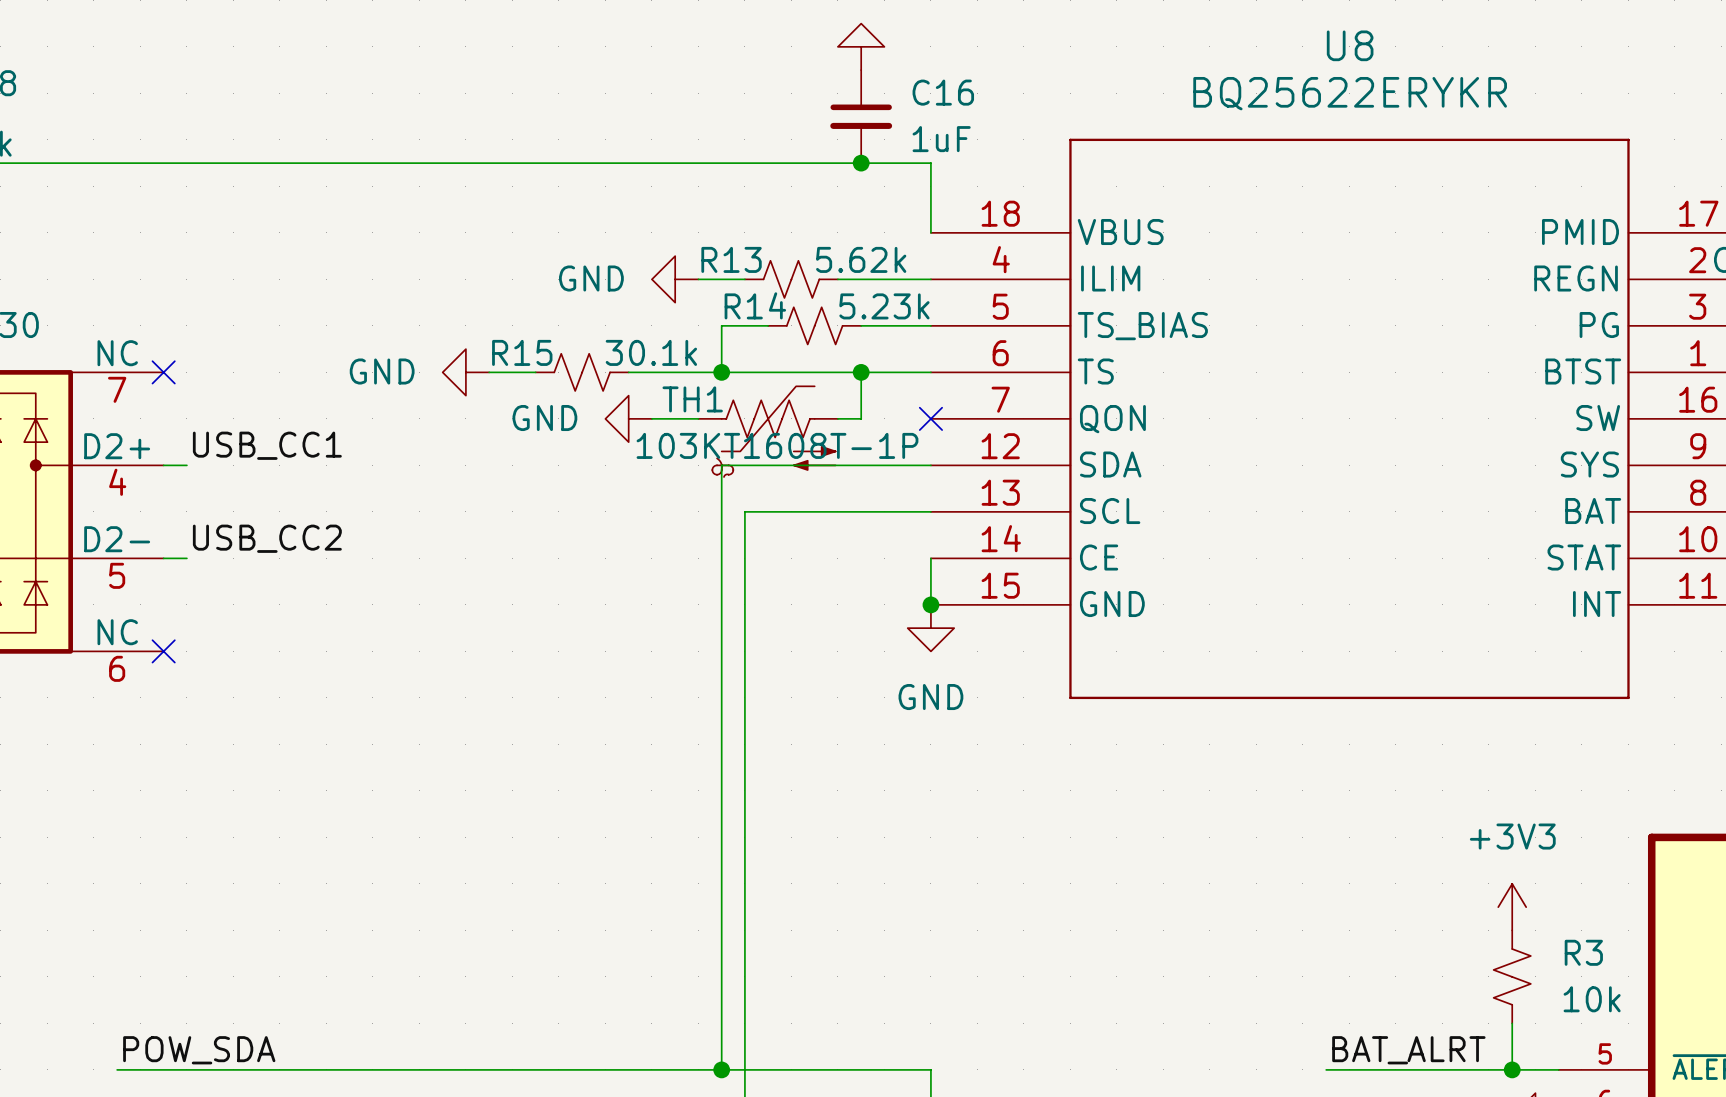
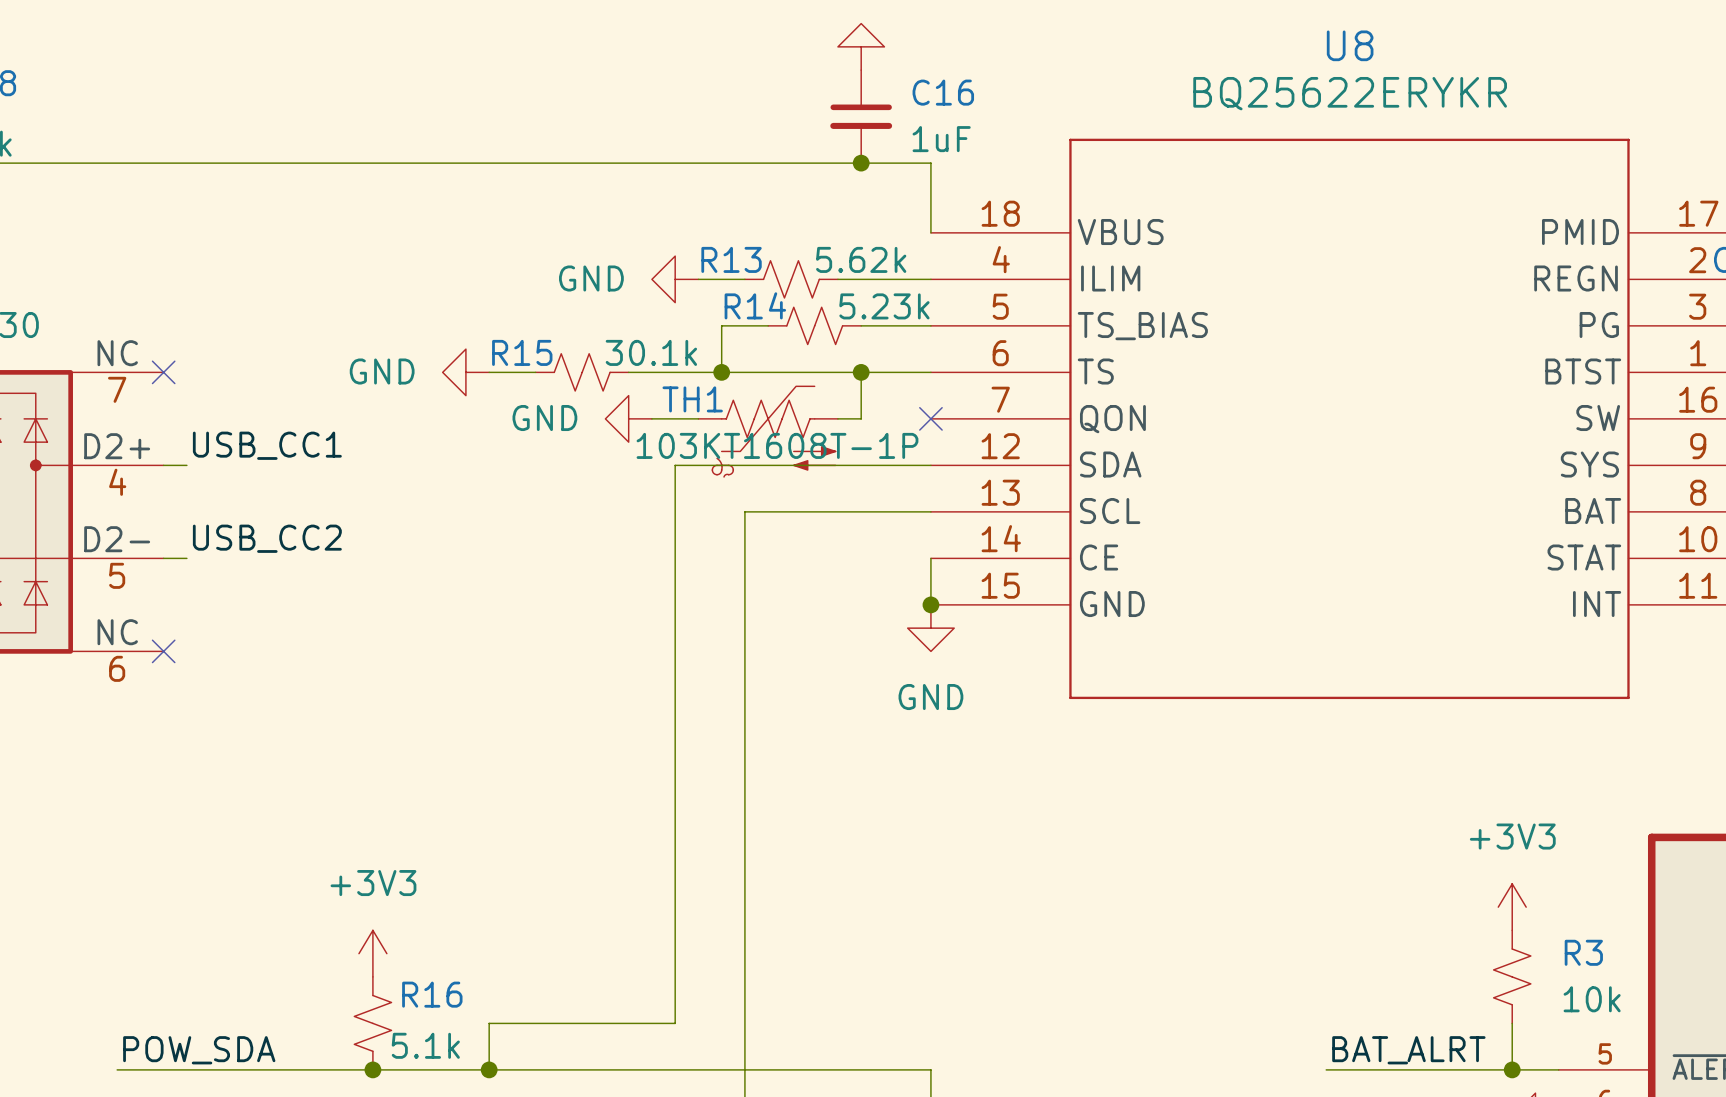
wire: (721, 465) (721, 1069) -> (721, 465) (675, 465) (675, 1023) (489, 1023) (489, 1069)
power symbol: none -> +3V3 (372, 953)
R16: none -> 5.1k (372, 1023)
junction: none -> (372, 1069)
junction: none -> (489, 1069)
junction: (721, 1069) -> none

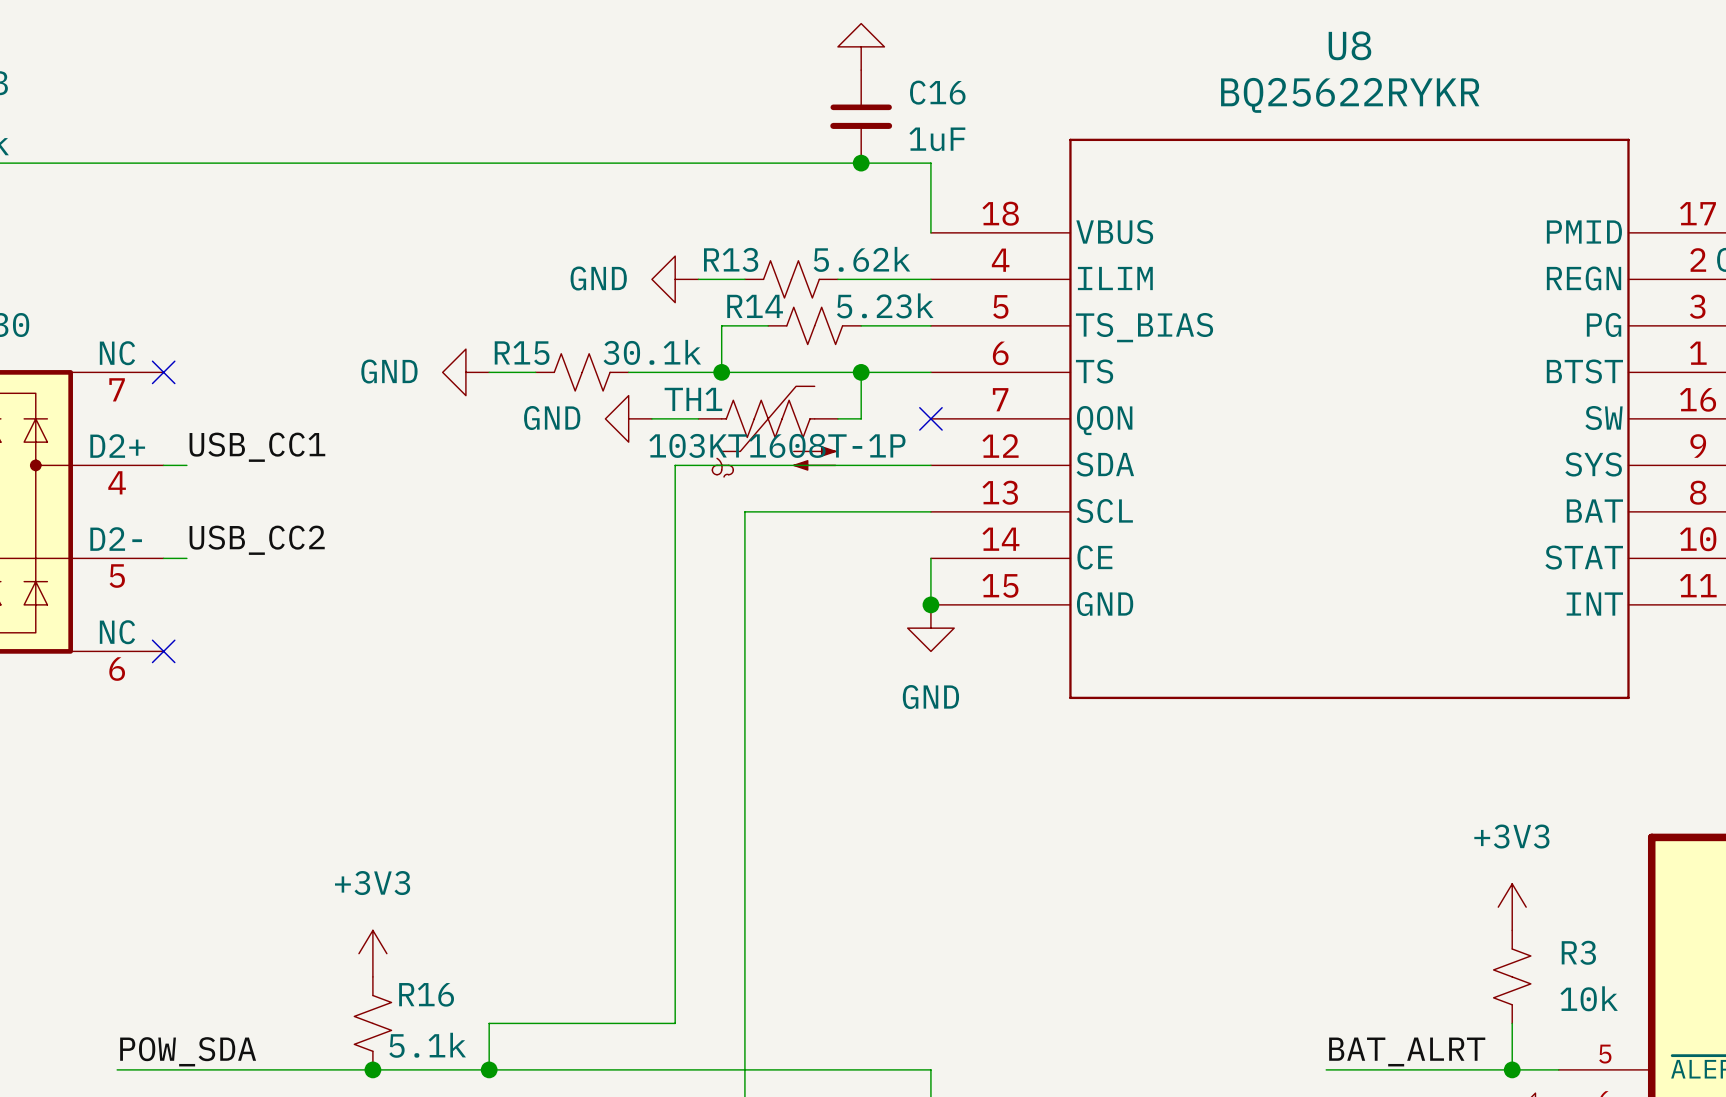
U8 value: BQ25622ERYKR (1350, 93) -> BQ25622RYKR (1350, 95)

